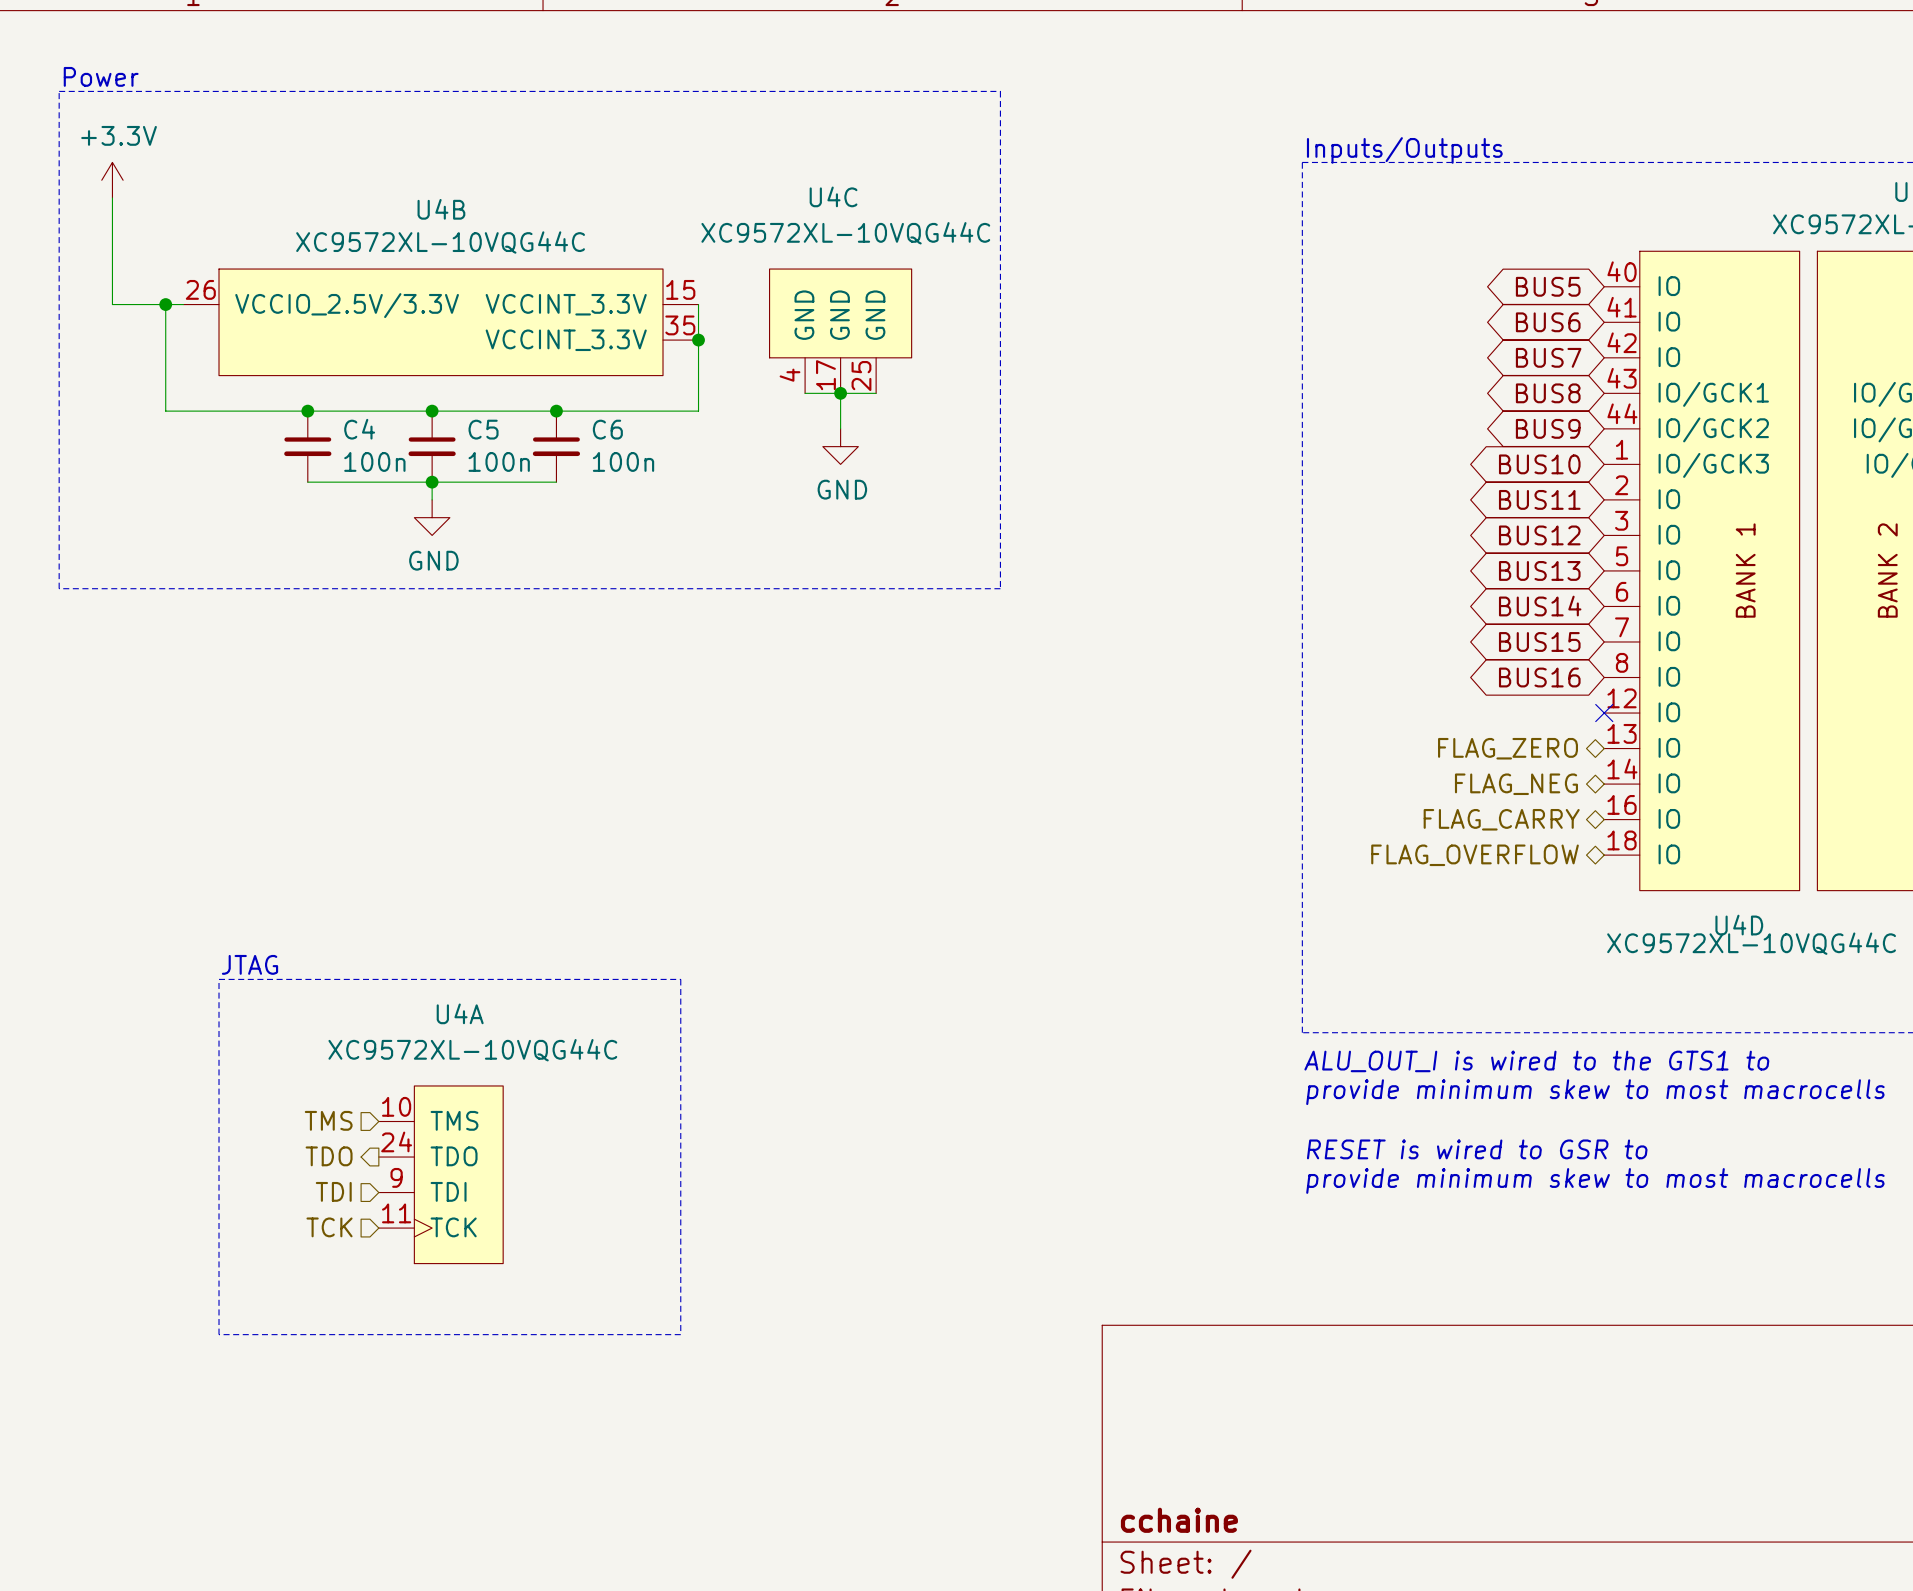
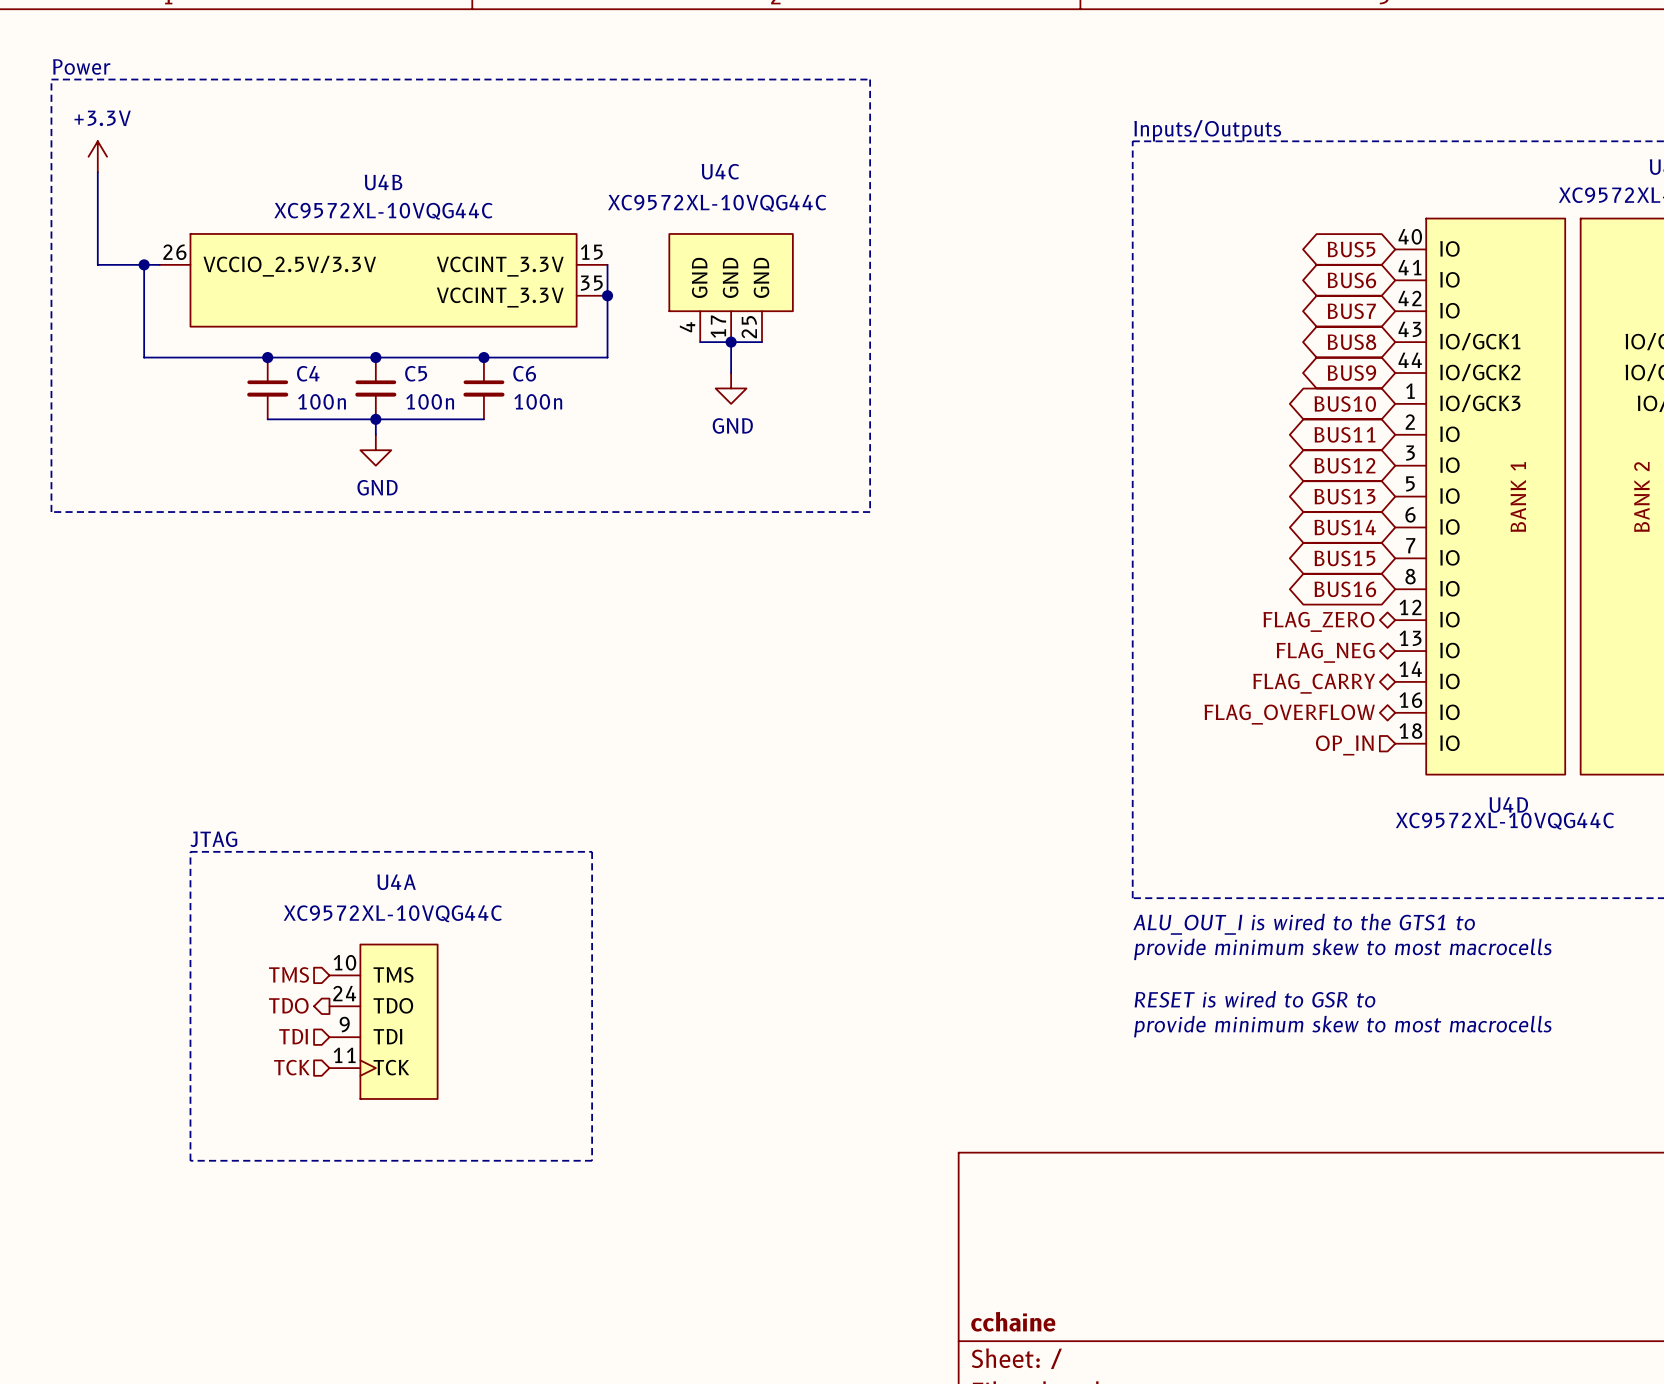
hierarchical label: none -> FLAG_ZERO (1318, 621)
no-connect mark: (1604, 713) -> none
hierarchical label: FLAG_ZERO (1508, 748) -> FLAG_NEG (1325, 652)
hierarchical label: FLAG_NEG (1516, 784) -> FLAG_CARRY (1314, 683)
hierarchical label: FLAG_CARRY (1501, 819) -> FLAG_OVERFLOW (1289, 714)
hierarchical label shape: bidirectional (1475, 855) -> input (1344, 745)
hierarchical label: FLAG_OVERFLOW (1475, 855) -> OP_IN (1344, 745)

